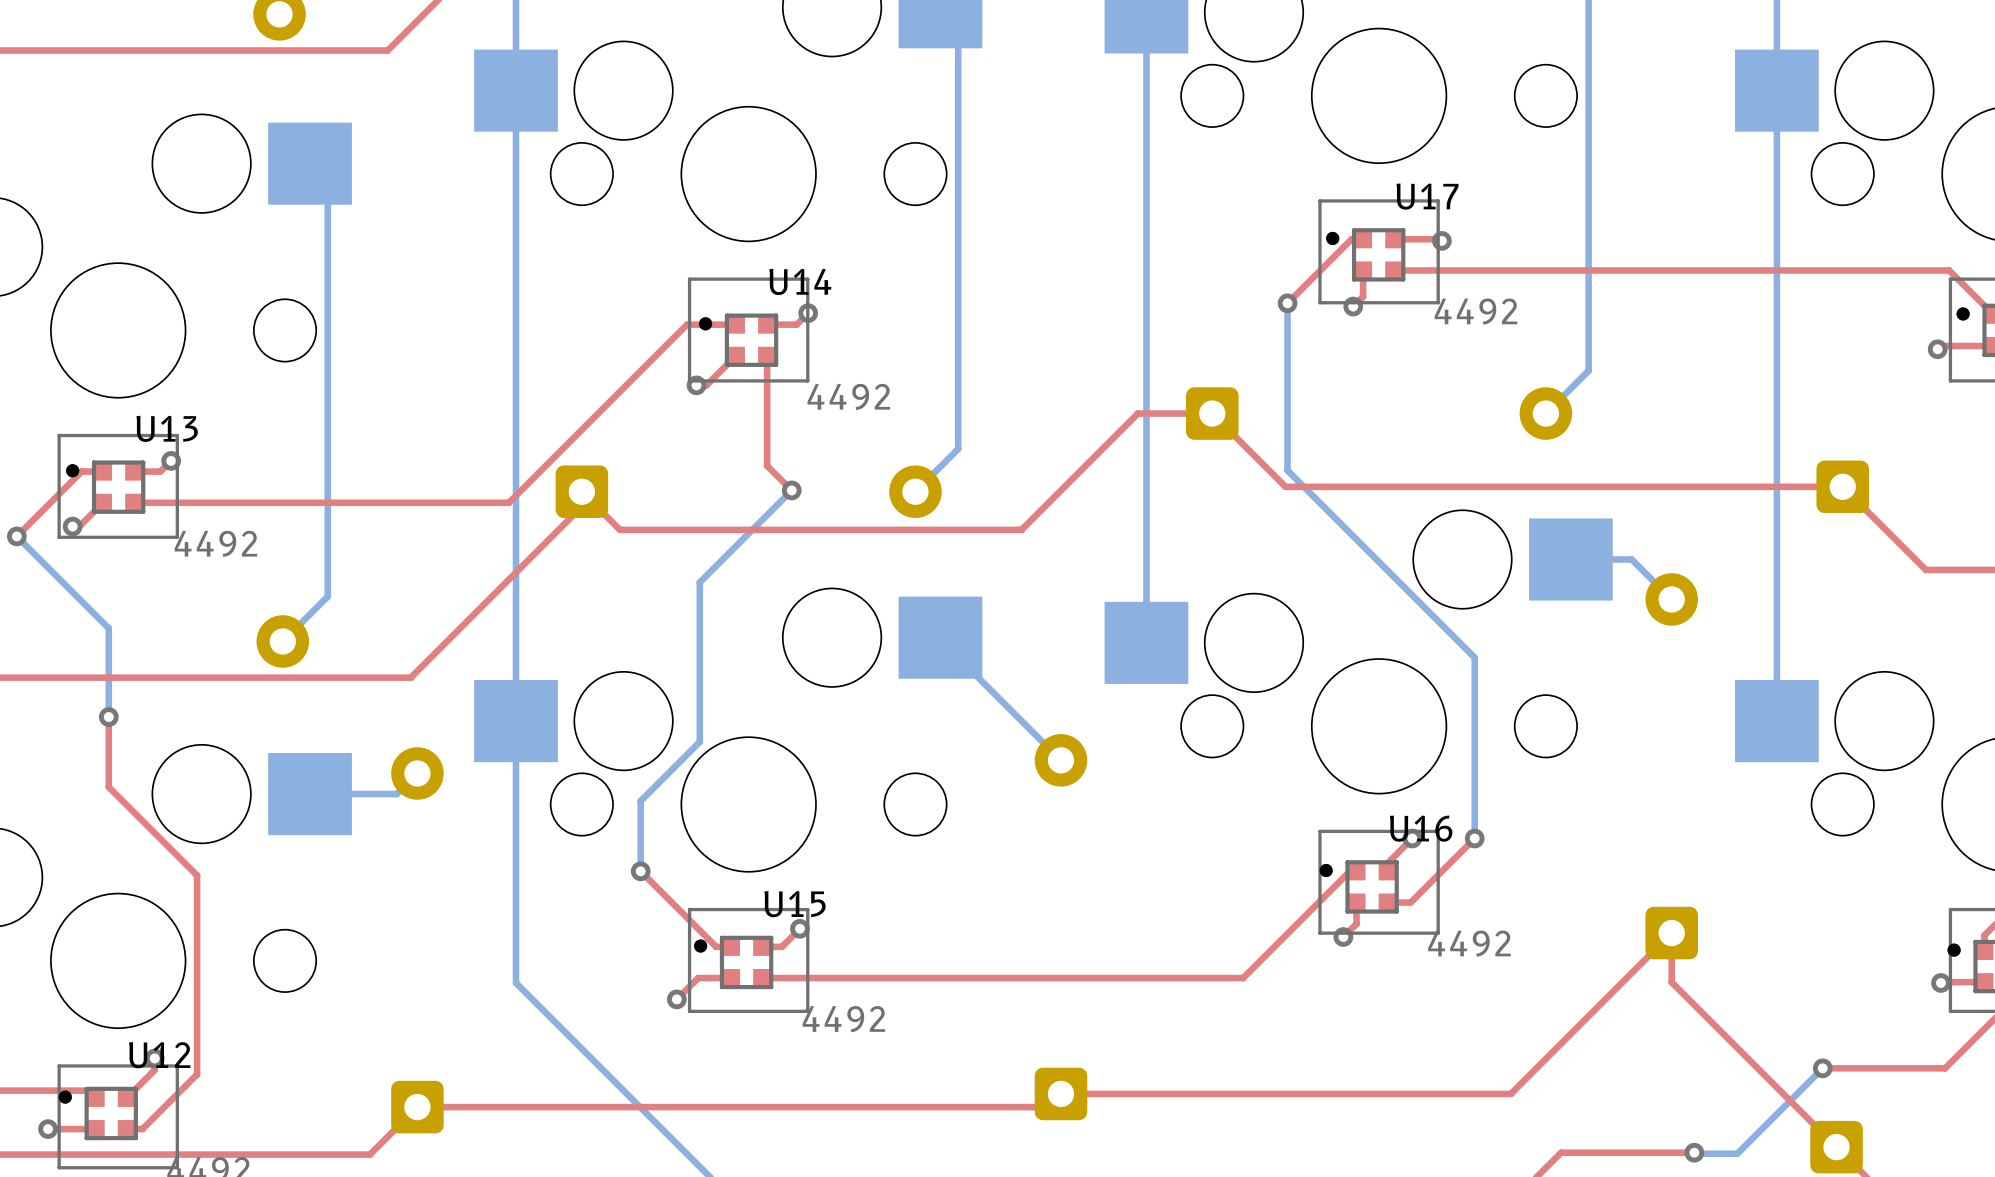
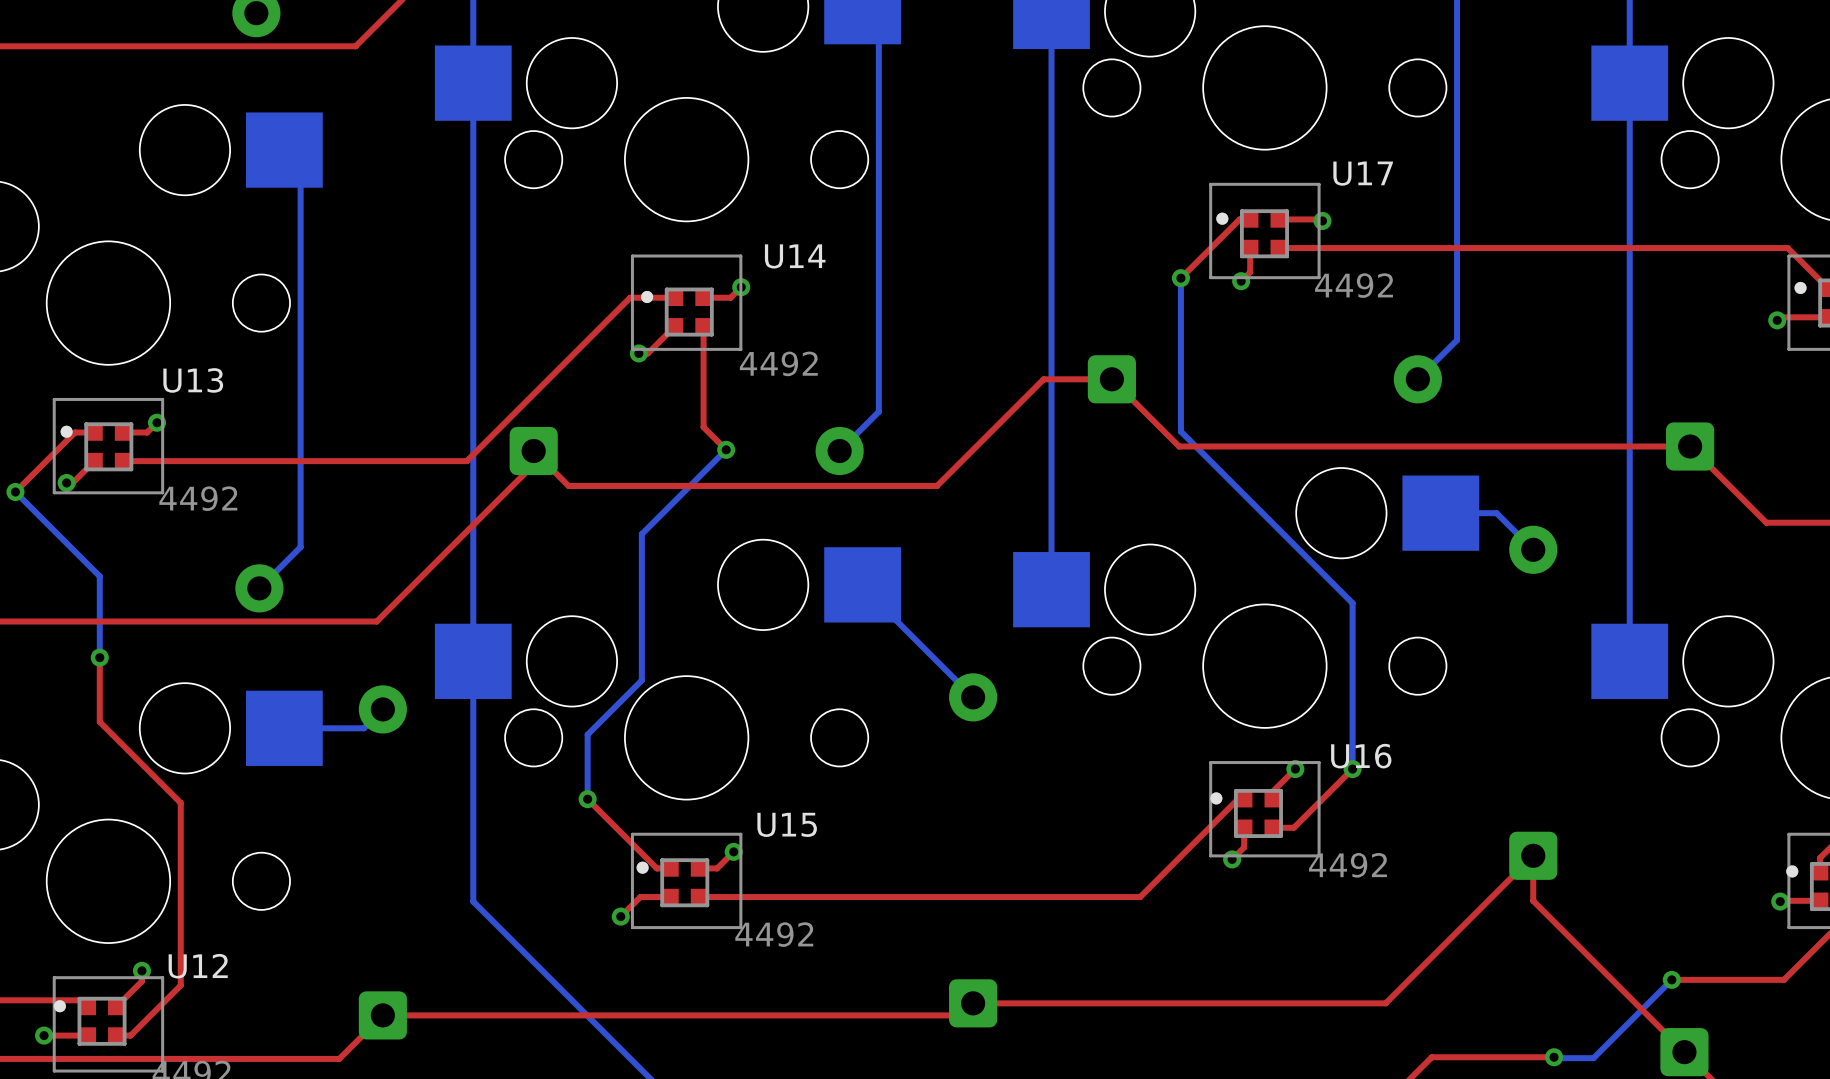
U17 name position: U17 (1427, 196) -> U17 (1363, 173)
U14 name position: U14 (800, 281) -> U14 (795, 256)
U13 name position: U13 (167, 428) -> U13 (193, 380)
U16 name position: U16 (1421, 828) -> U16 (1361, 756)
U15 name position: U15 (794, 904) -> U15 (787, 824)
U12 name position: U12 (159, 1055) -> U12 (198, 966)

